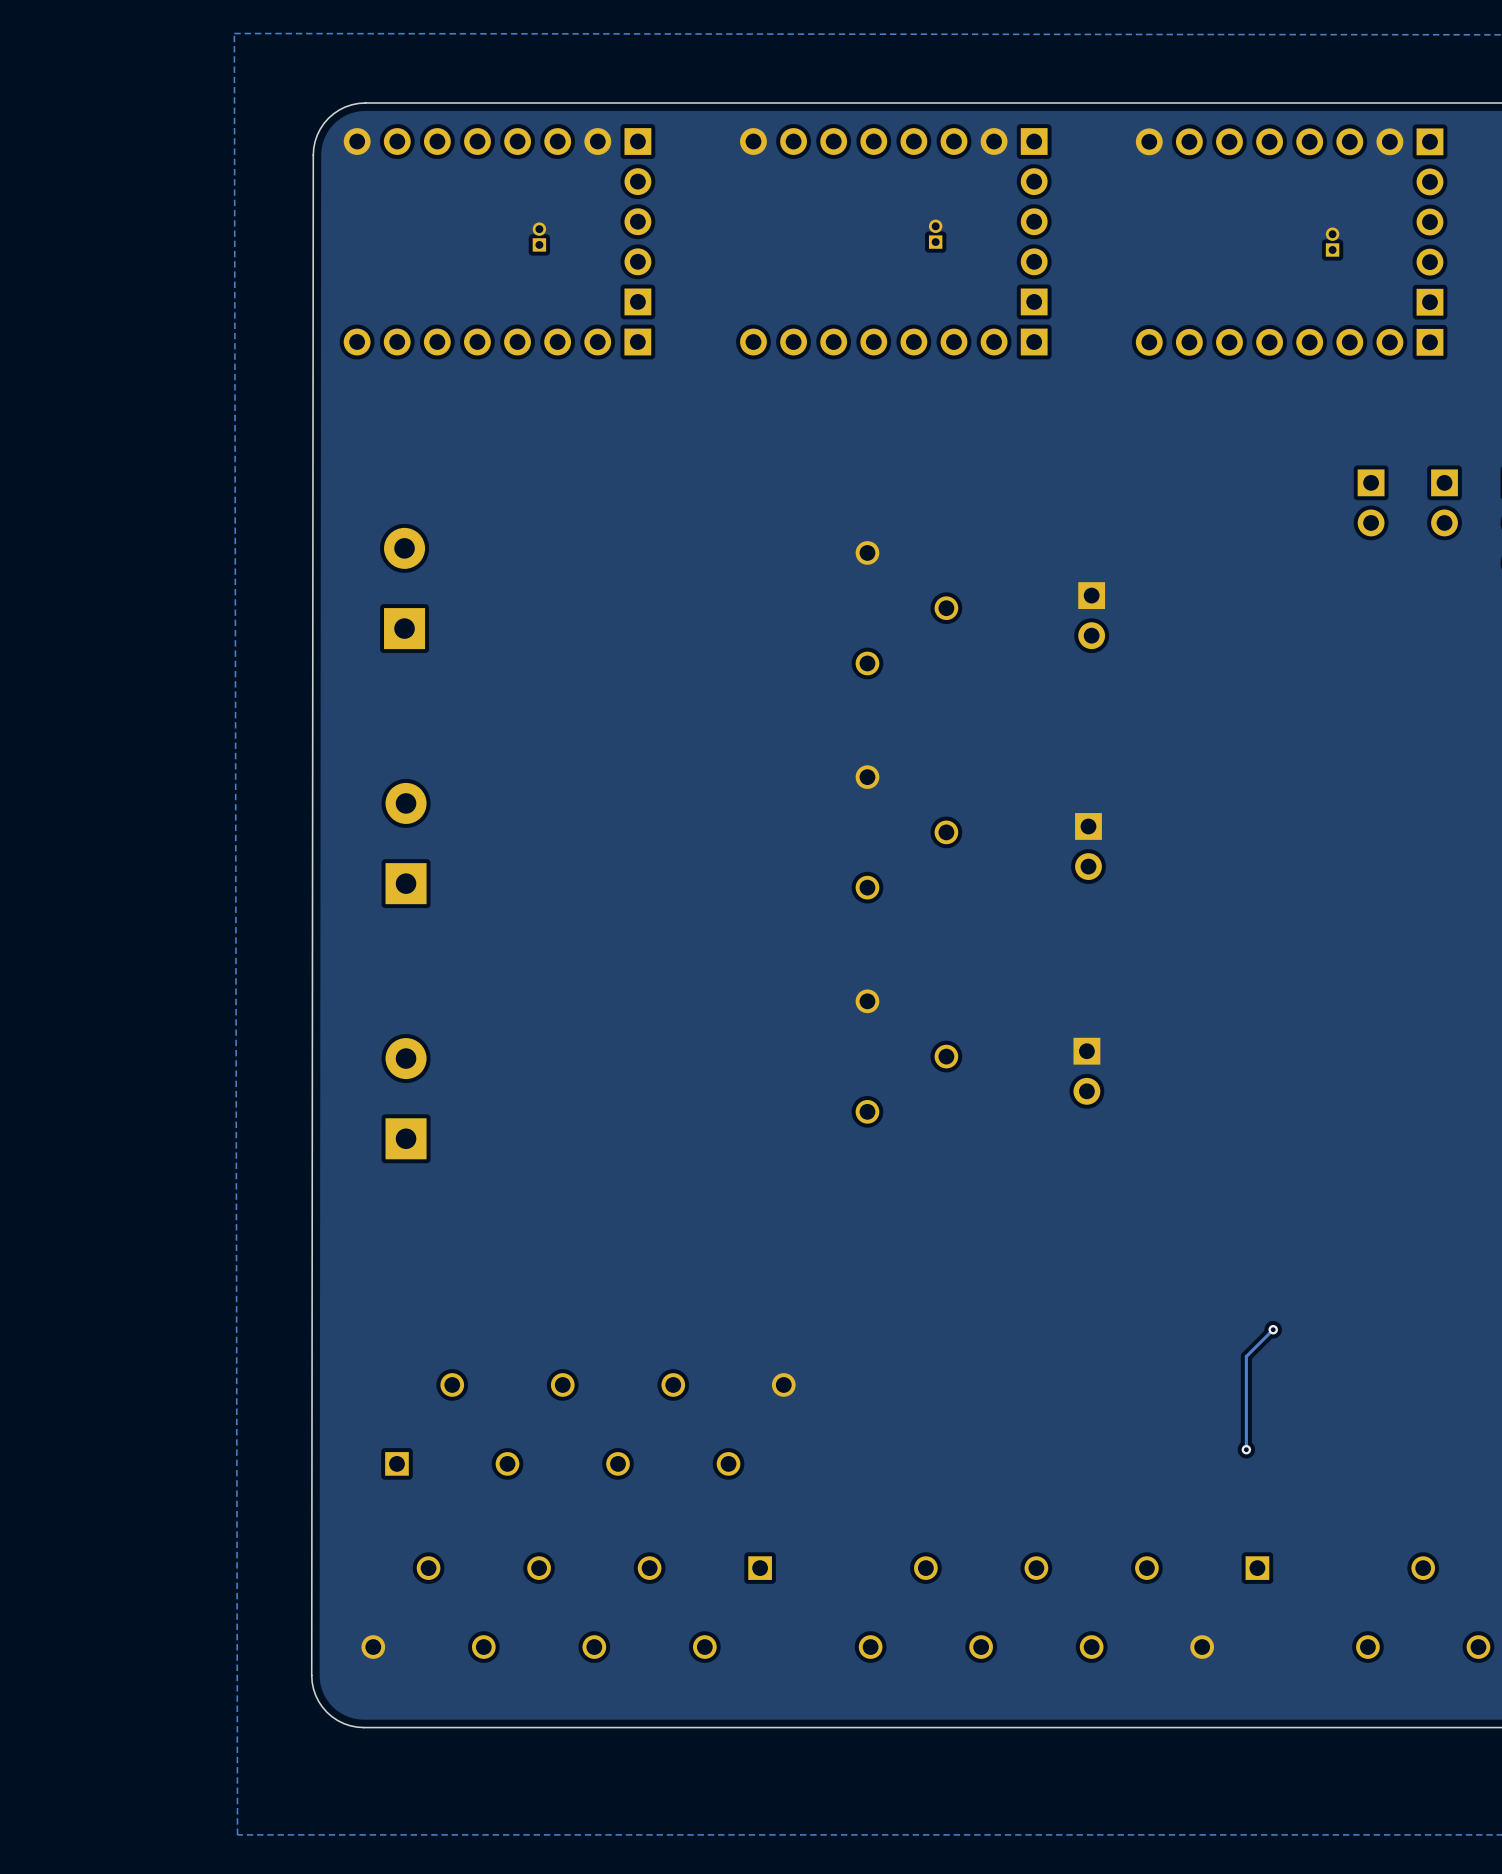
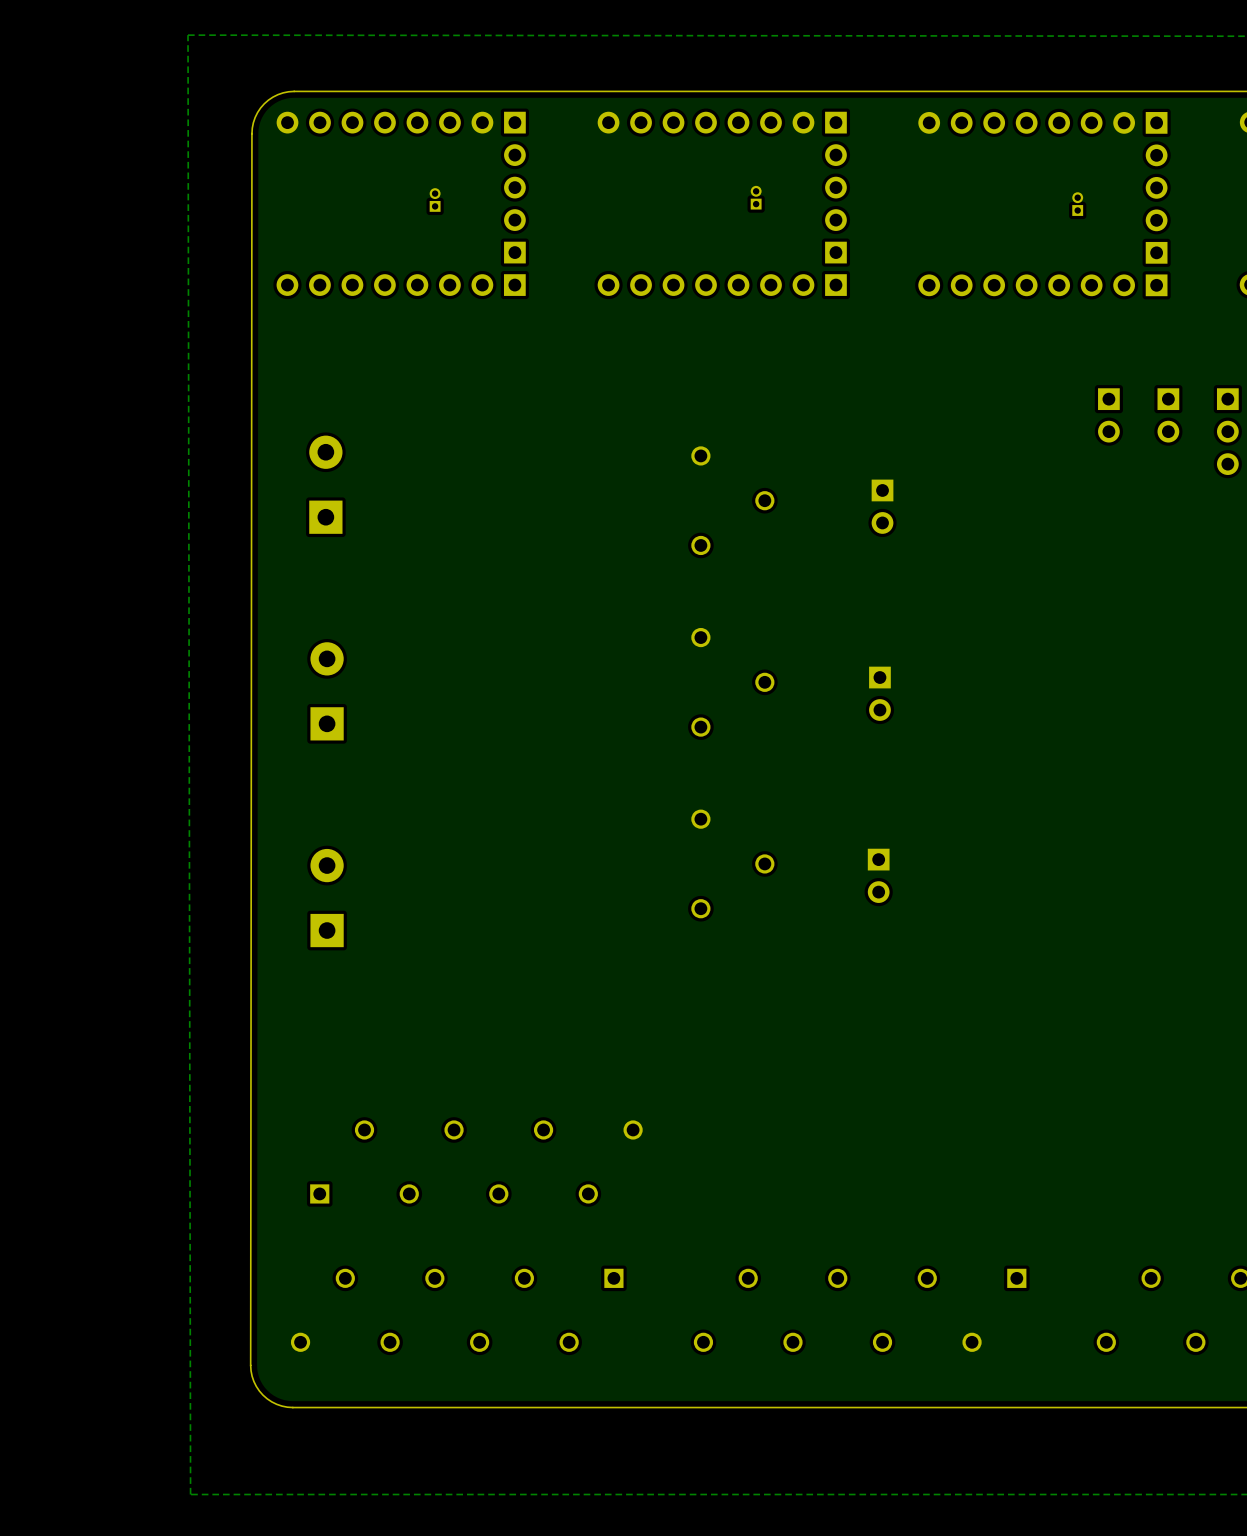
track: (1273, 1329) (1246, 1356) (1246, 1449) -> none
via: (1273, 1329) -> none
via: (1246, 1449) -> none

